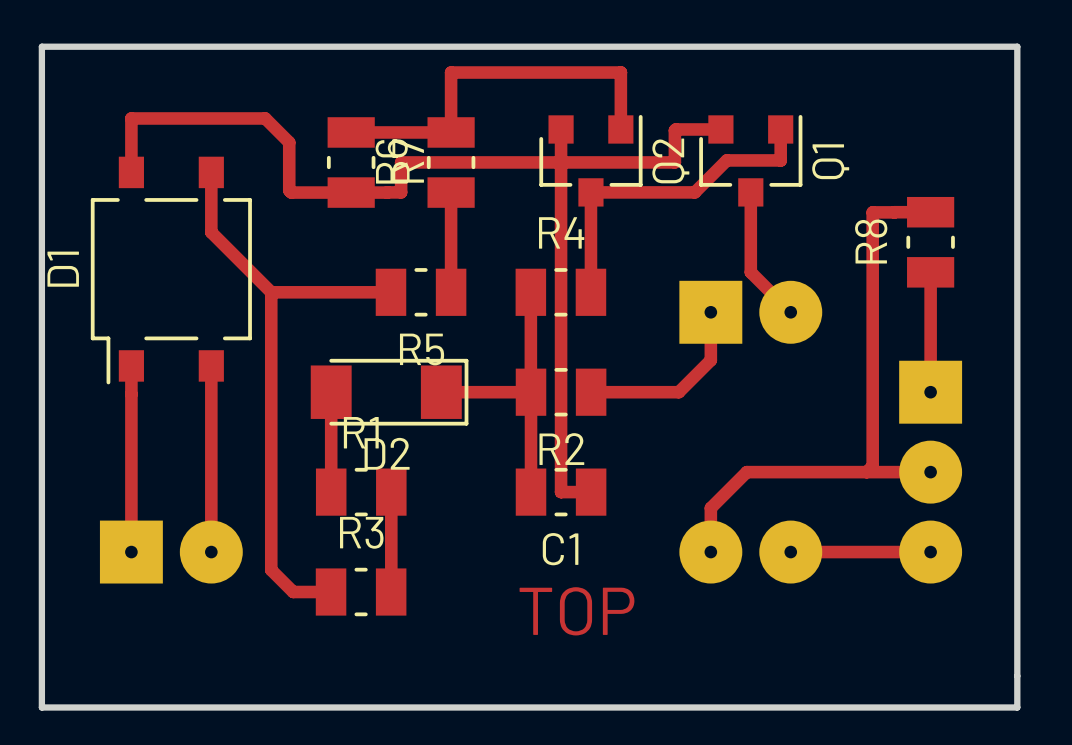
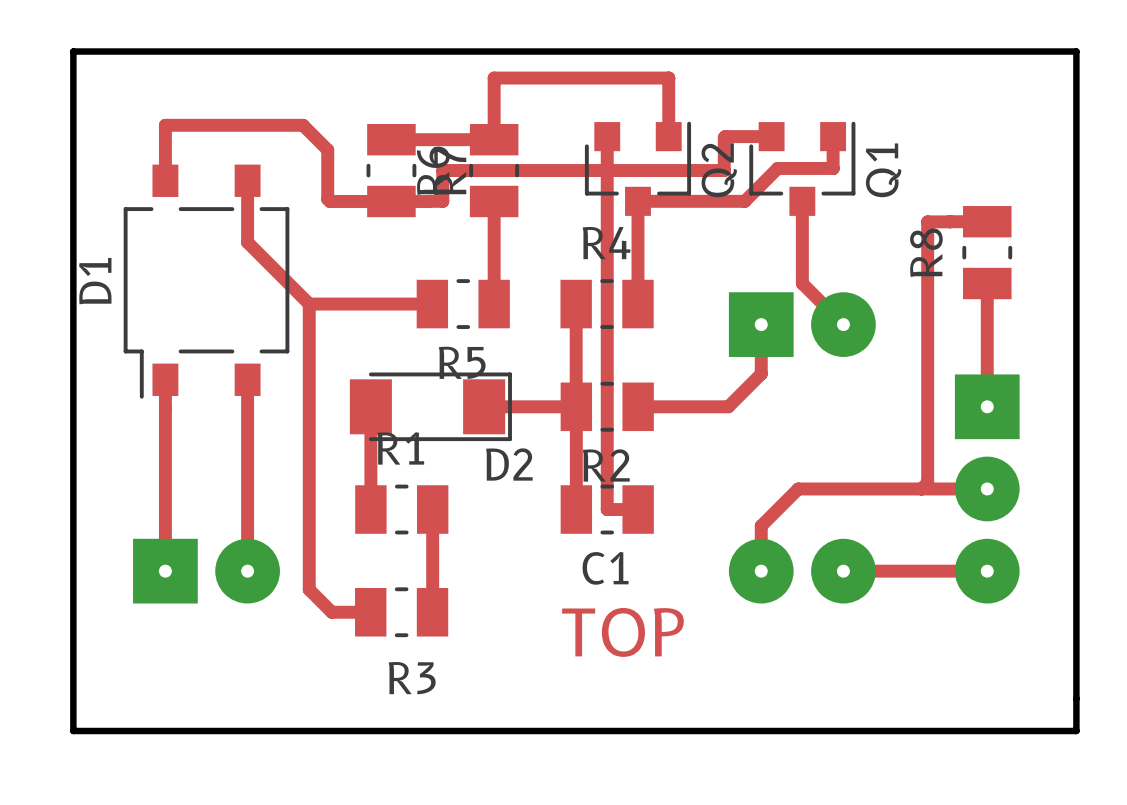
D2 name position: D2 (387, 453) -> D2 (509, 464)
R3 name position: R3 (361, 532) -> R3 (412, 678)

